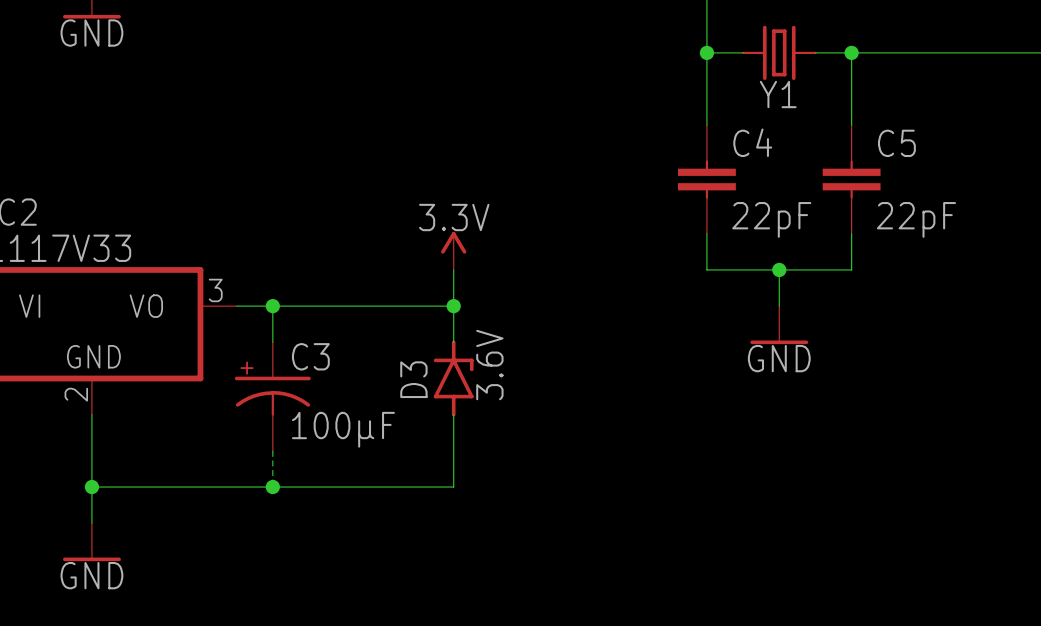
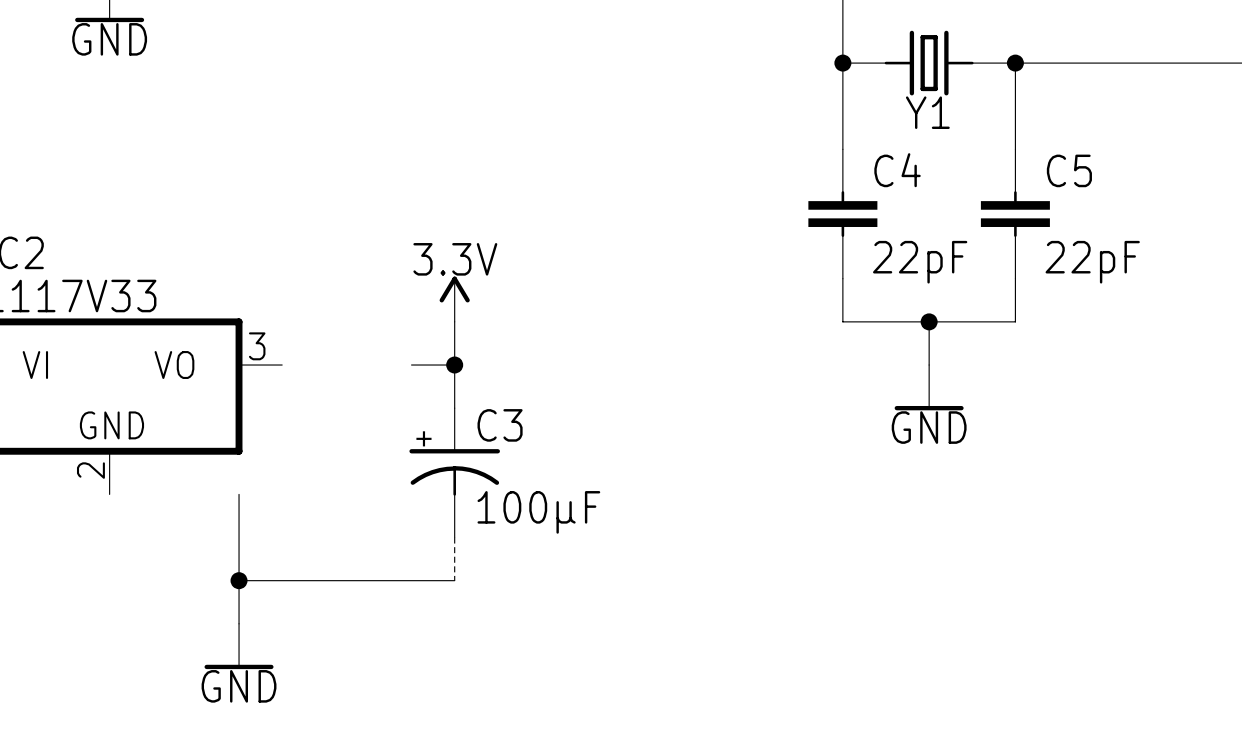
power symbol position: 3.3V (453, 250) -> 3.3V (454, 299)
wire: (453, 269) (453, 342) -> (454, 321) (454, 408)
wire: (236, 306) (345, 306) -> none
wire: (272, 306) (272, 342) -> none
junction: (272, 306) -> none
wire: (381, 306) (453, 306) -> none
junction: none -> (454, 365)
junction: (453, 306) -> none
D3: 3.6V (453, 378) -> none
C3 position: (272, 396) -> (454, 472)
wire: (91, 414) (91, 523) -> (239, 494) (239, 623)
wire: (453, 414) (453, 487) (381, 487) -> (454, 537) (454, 580)
wire: (272, 450) (272, 487) -> none
wire: (91, 487) (200, 487) -> none
junction: (91, 487) -> none
junction: none -> (239, 580)
junction: (272, 487) -> none
power symbol position: GND (91, 542) -> GND (239, 646)

